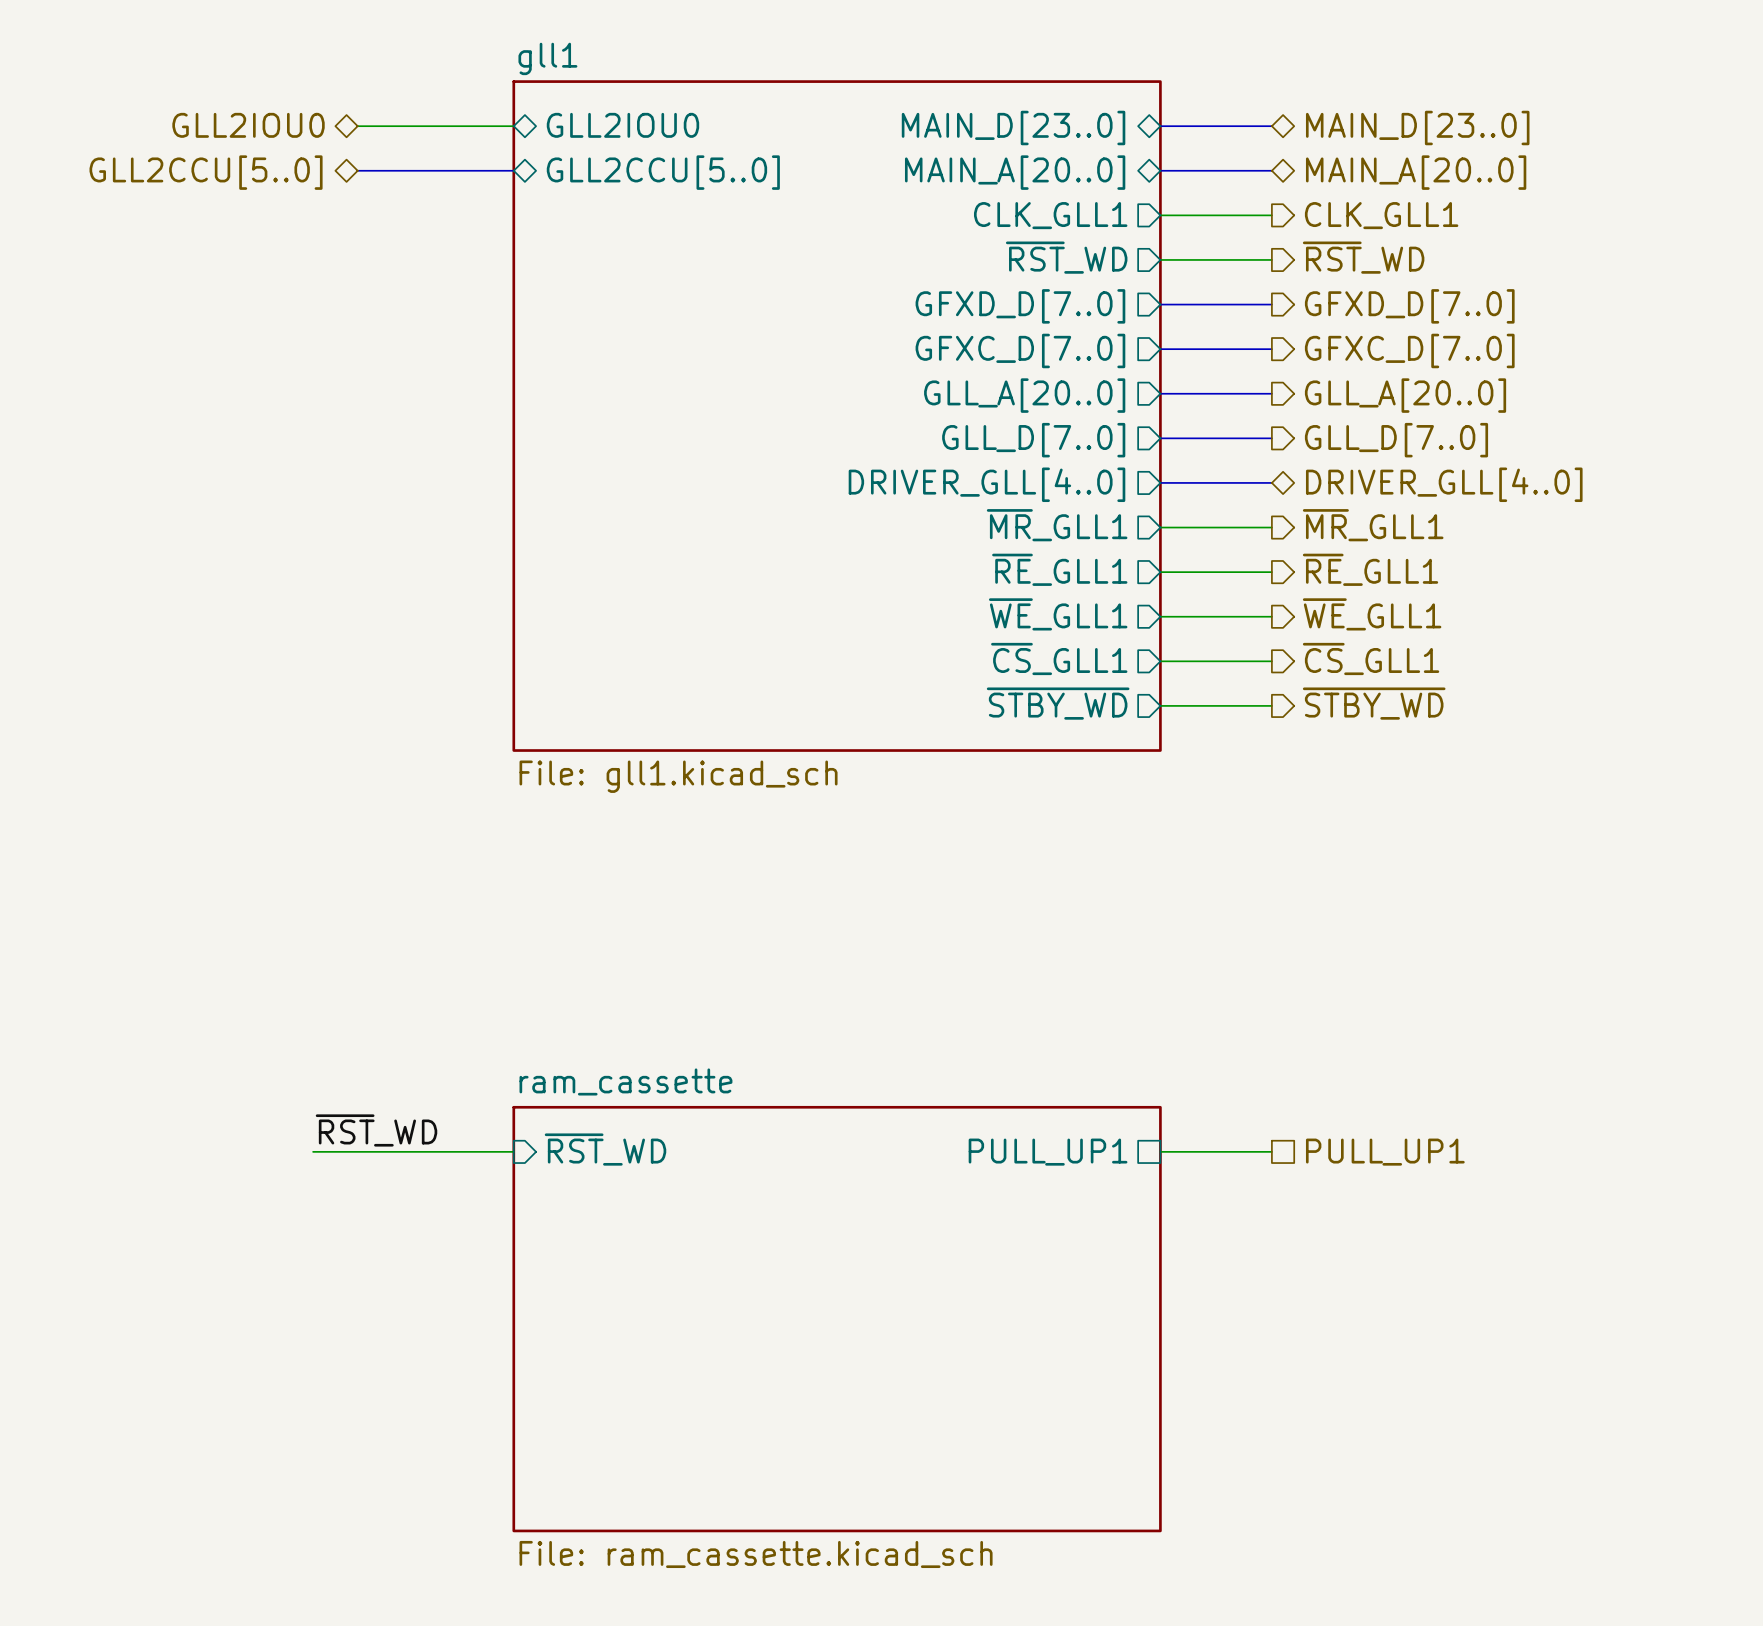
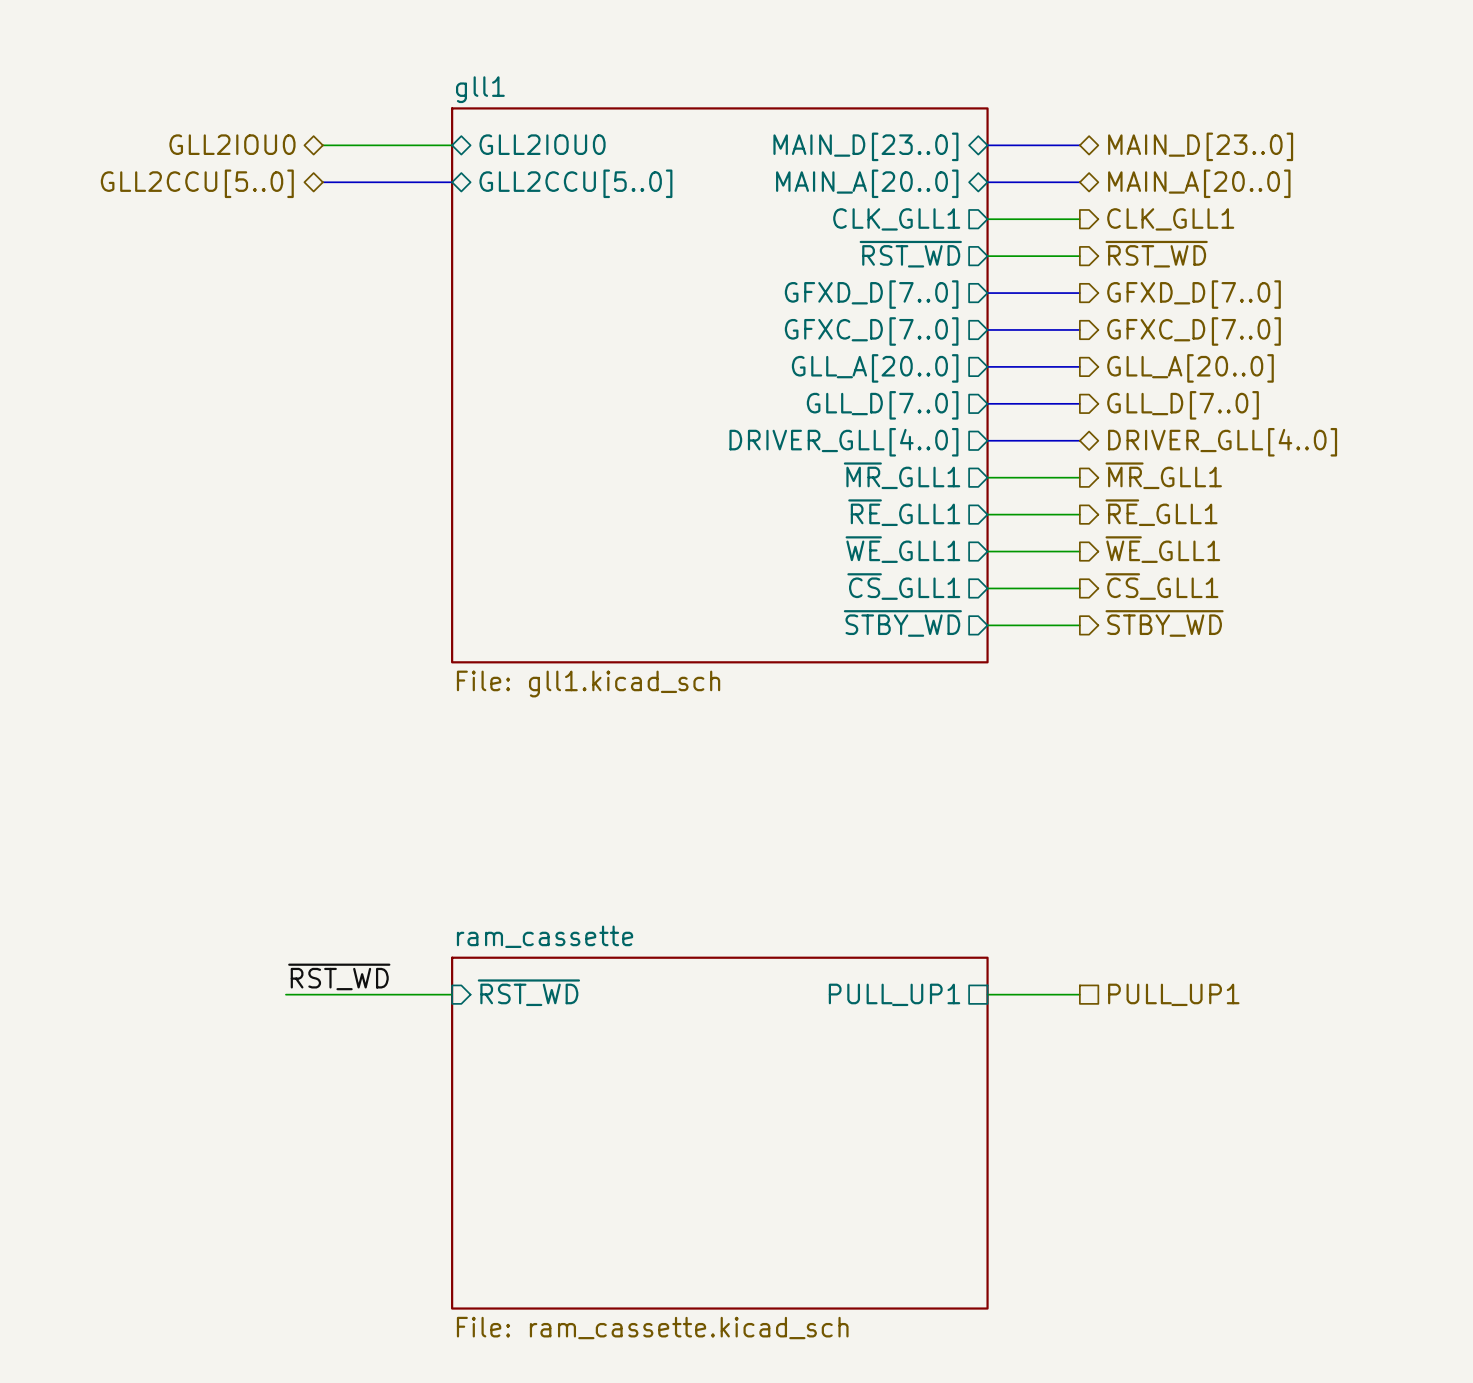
sheet pin: ~{RST}_WD (1066, 257) -> ~{RST_WD} (910, 254)
hierarchical label: ~{RST}_WD (1363, 257) -> ~{RST_WD} (1156, 254)
label: ~{RST}_WD (376, 1130) -> ~{RST_WD} (339, 976)
sheet pin: ~{RST}_WD (605, 1149) -> ~{RST_WD} (528, 992)

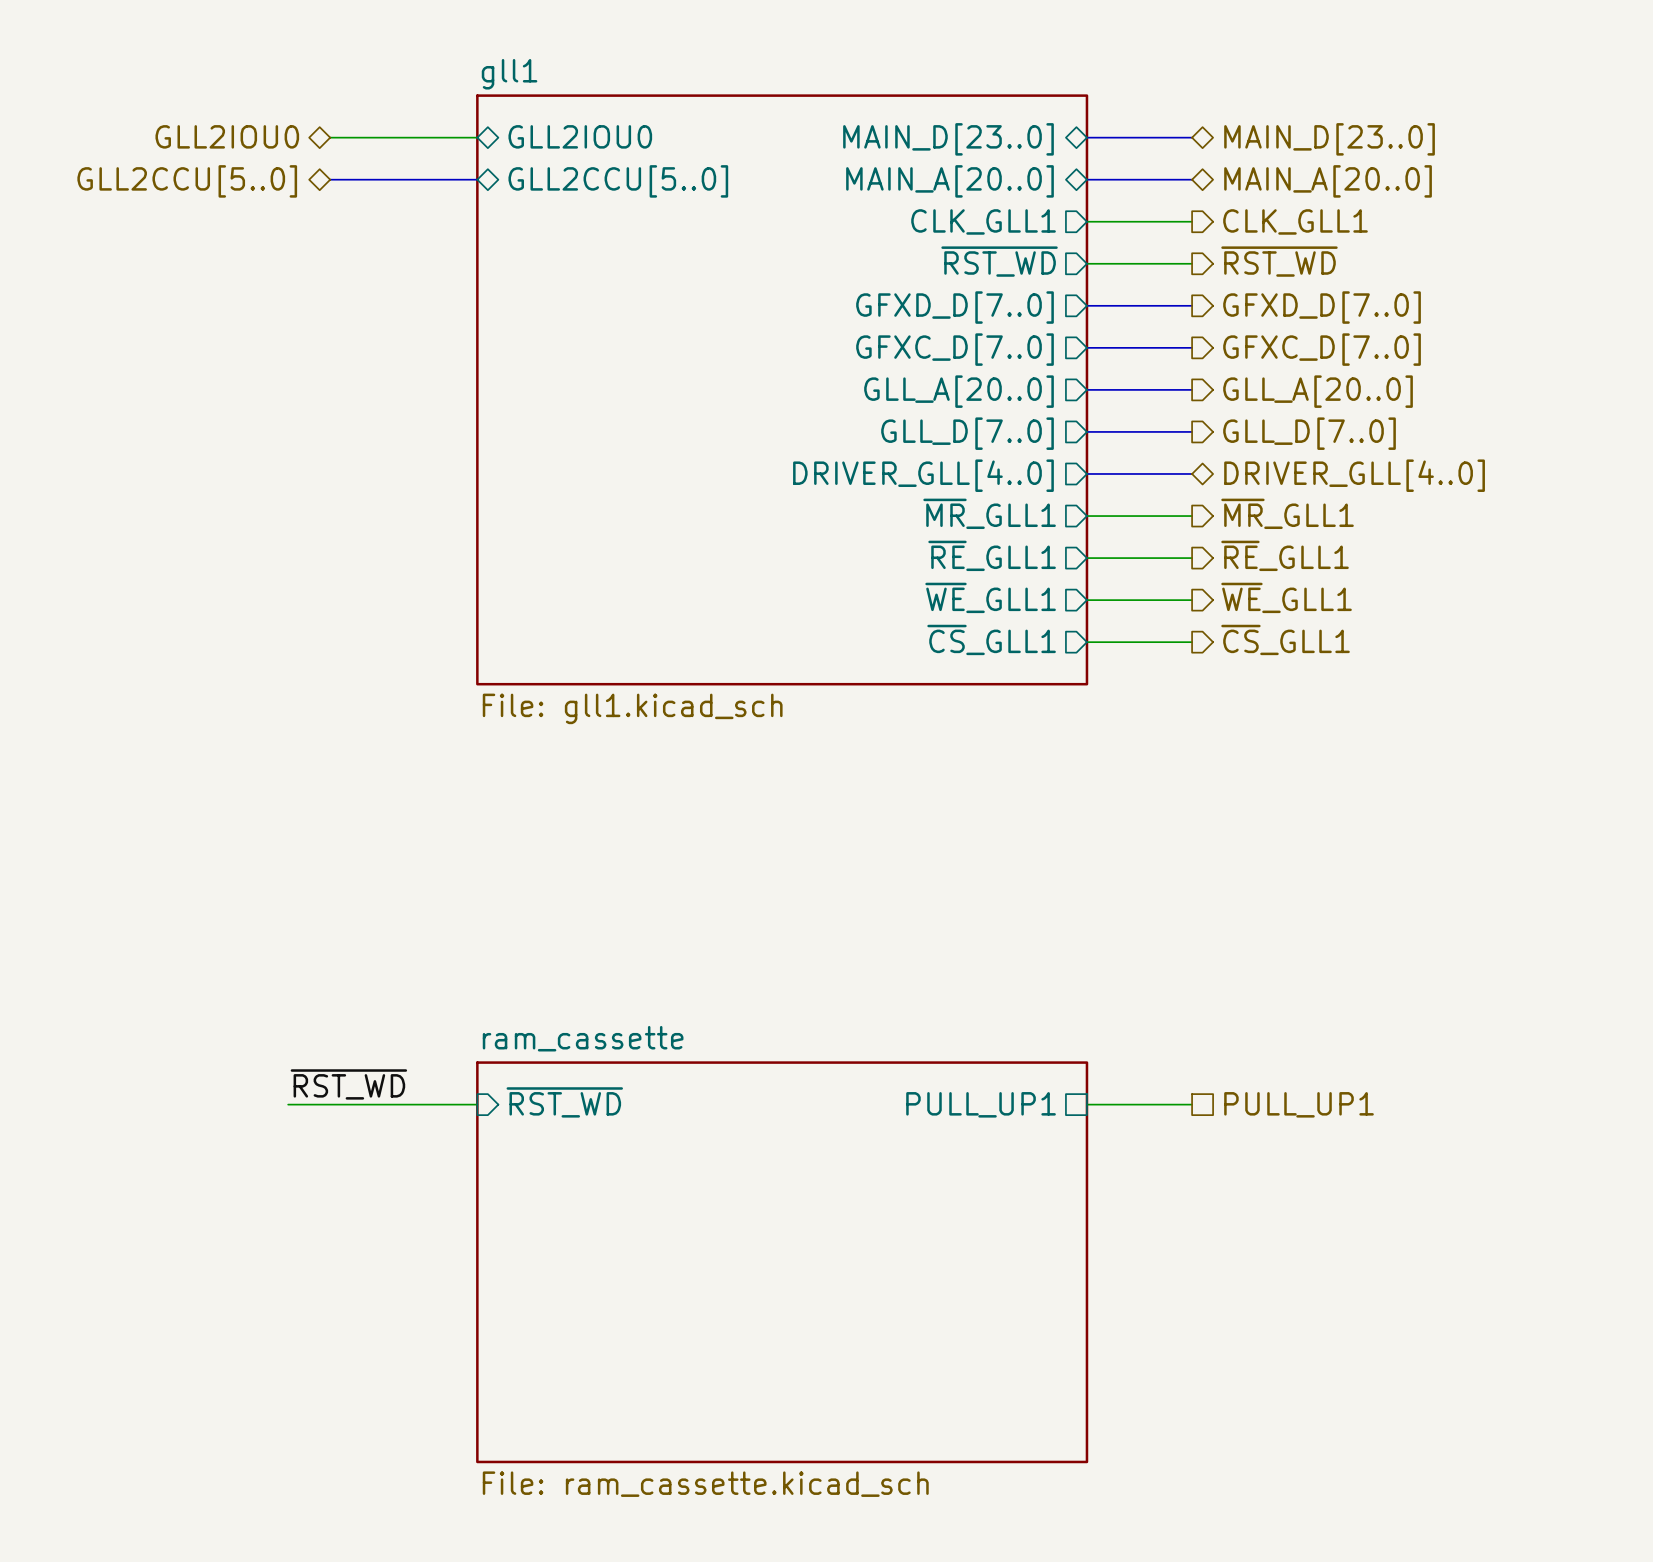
sheet gll1 shape: [451, 107, 989, 664] -> [476, 94, 1089, 686]
sheet pin: ~{STBY_WD} (902, 623) -> none
hierarchical label: ~{STBY_WD} (1164, 623) -> none
wire: (987, 625) (1079, 625) -> none

